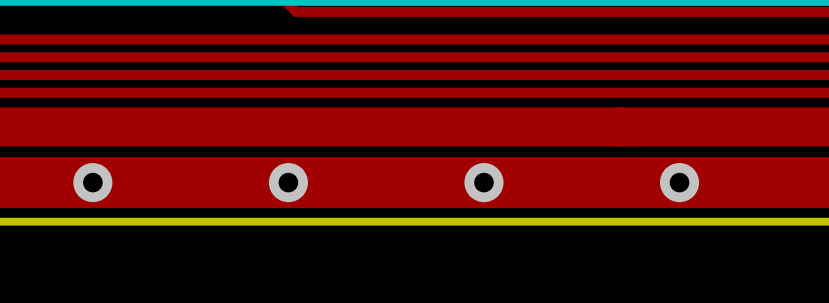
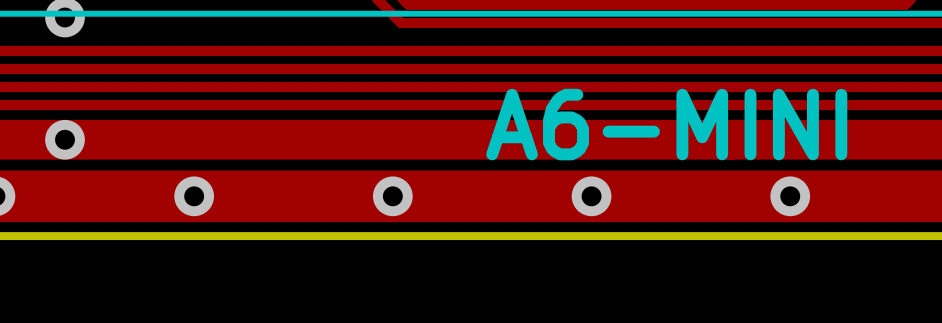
text: none -> A6-MINI (666, 124)

